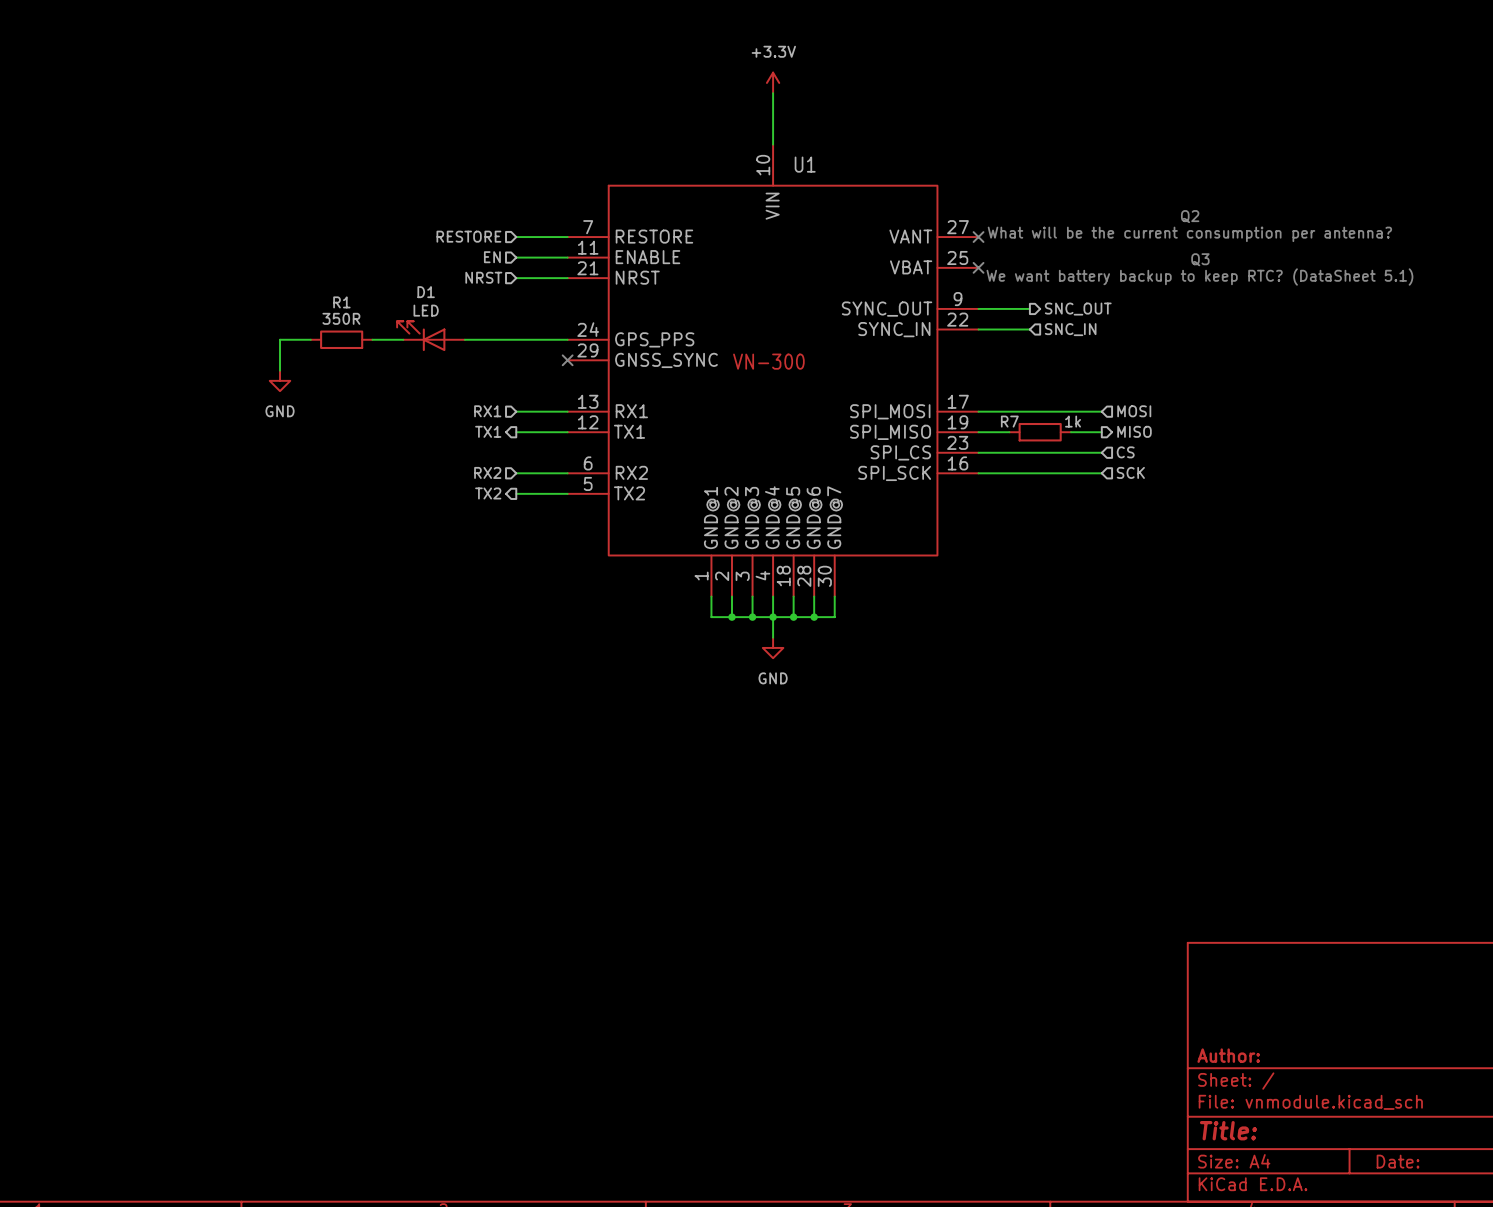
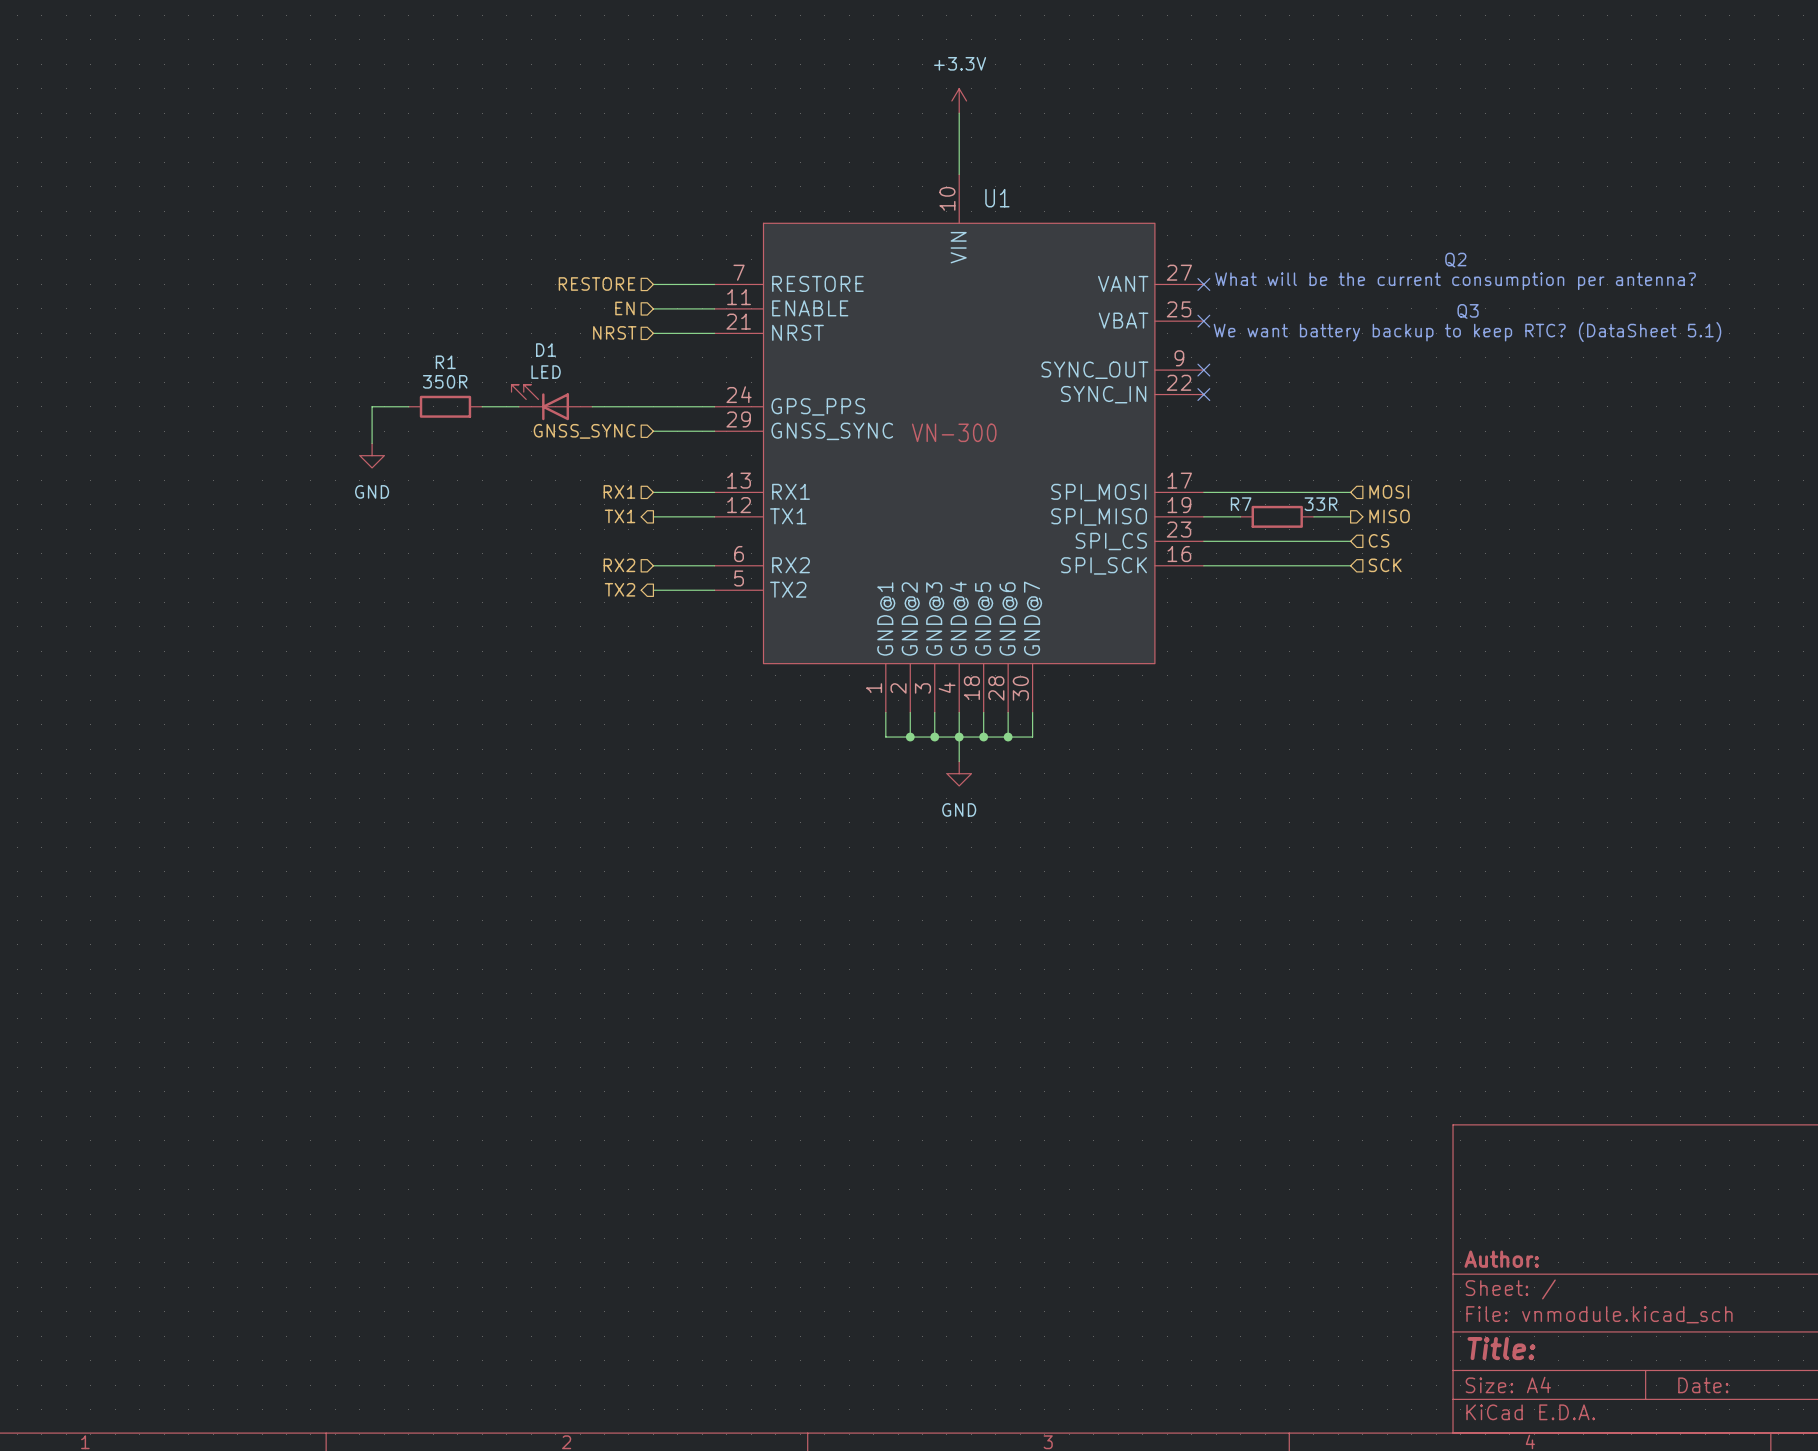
wire: (978, 308) (1029, 308) -> none
no-connect mark: none -> (1203, 370)
hierarchical label: SNC_OUT (1078, 309) -> none
wire: (978, 329) (1029, 329) -> none
no-connect mark: none -> (1203, 394)
hierarchical label: SNC_IN (1070, 329) -> none
hierarchical label: none -> GNSS_SYNC (584, 431)
wire: none -> (653, 431) (714, 431)
no-connect mark: (567, 360) -> none
R7 value: 1k (1073, 421) -> 33R (1320, 504)

